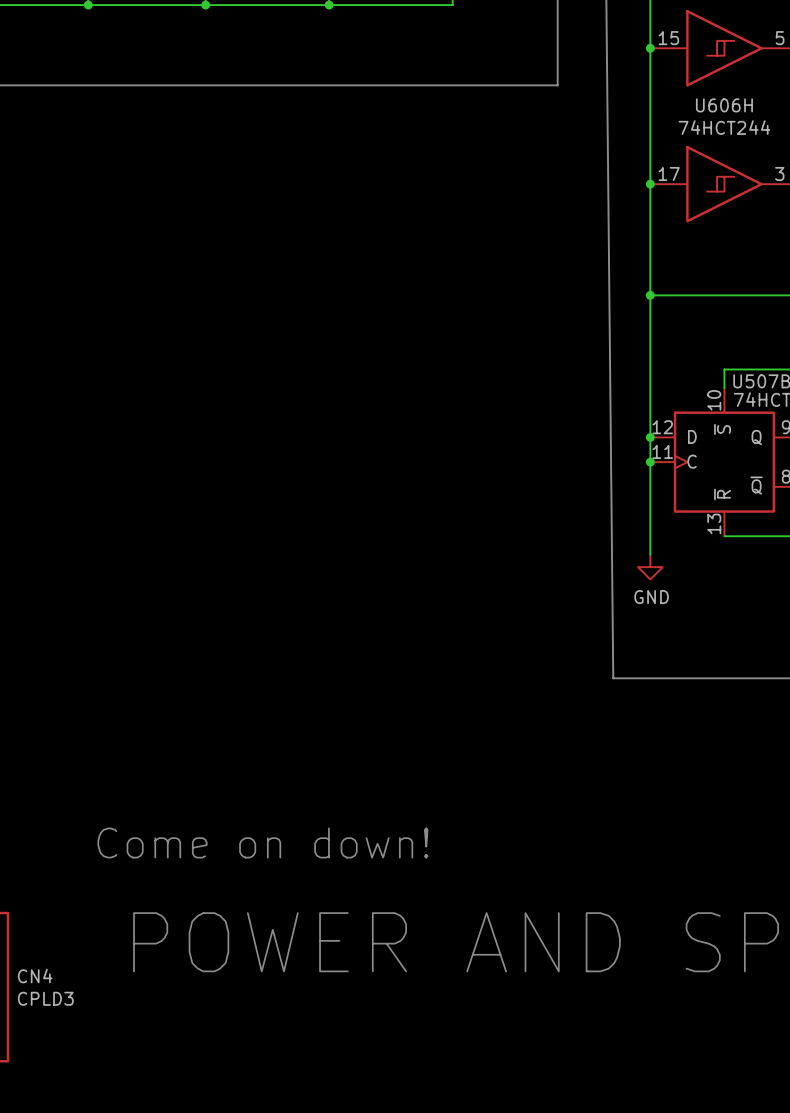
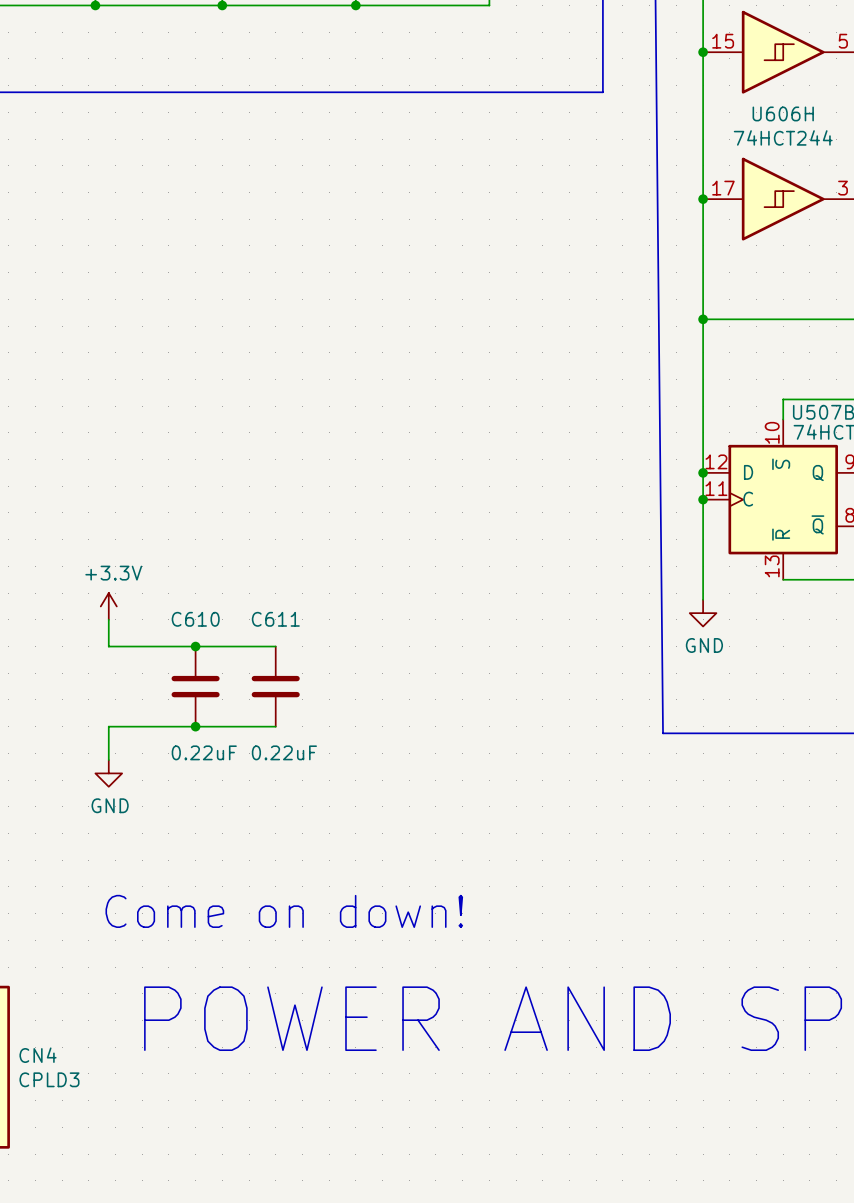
power symbol: none -> +3.3V (108, 606)
wire: none -> (108, 619) (108, 646) (275, 646)
junction: none -> (195, 646)
C610: none -> 0.22uF (195, 686)
C611: none -> 0.22uF (275, 686)
junction: none -> (195, 726)
wire: none -> (275, 726) (108, 726) (108, 760)
power symbol: none -> GND (108, 773)

